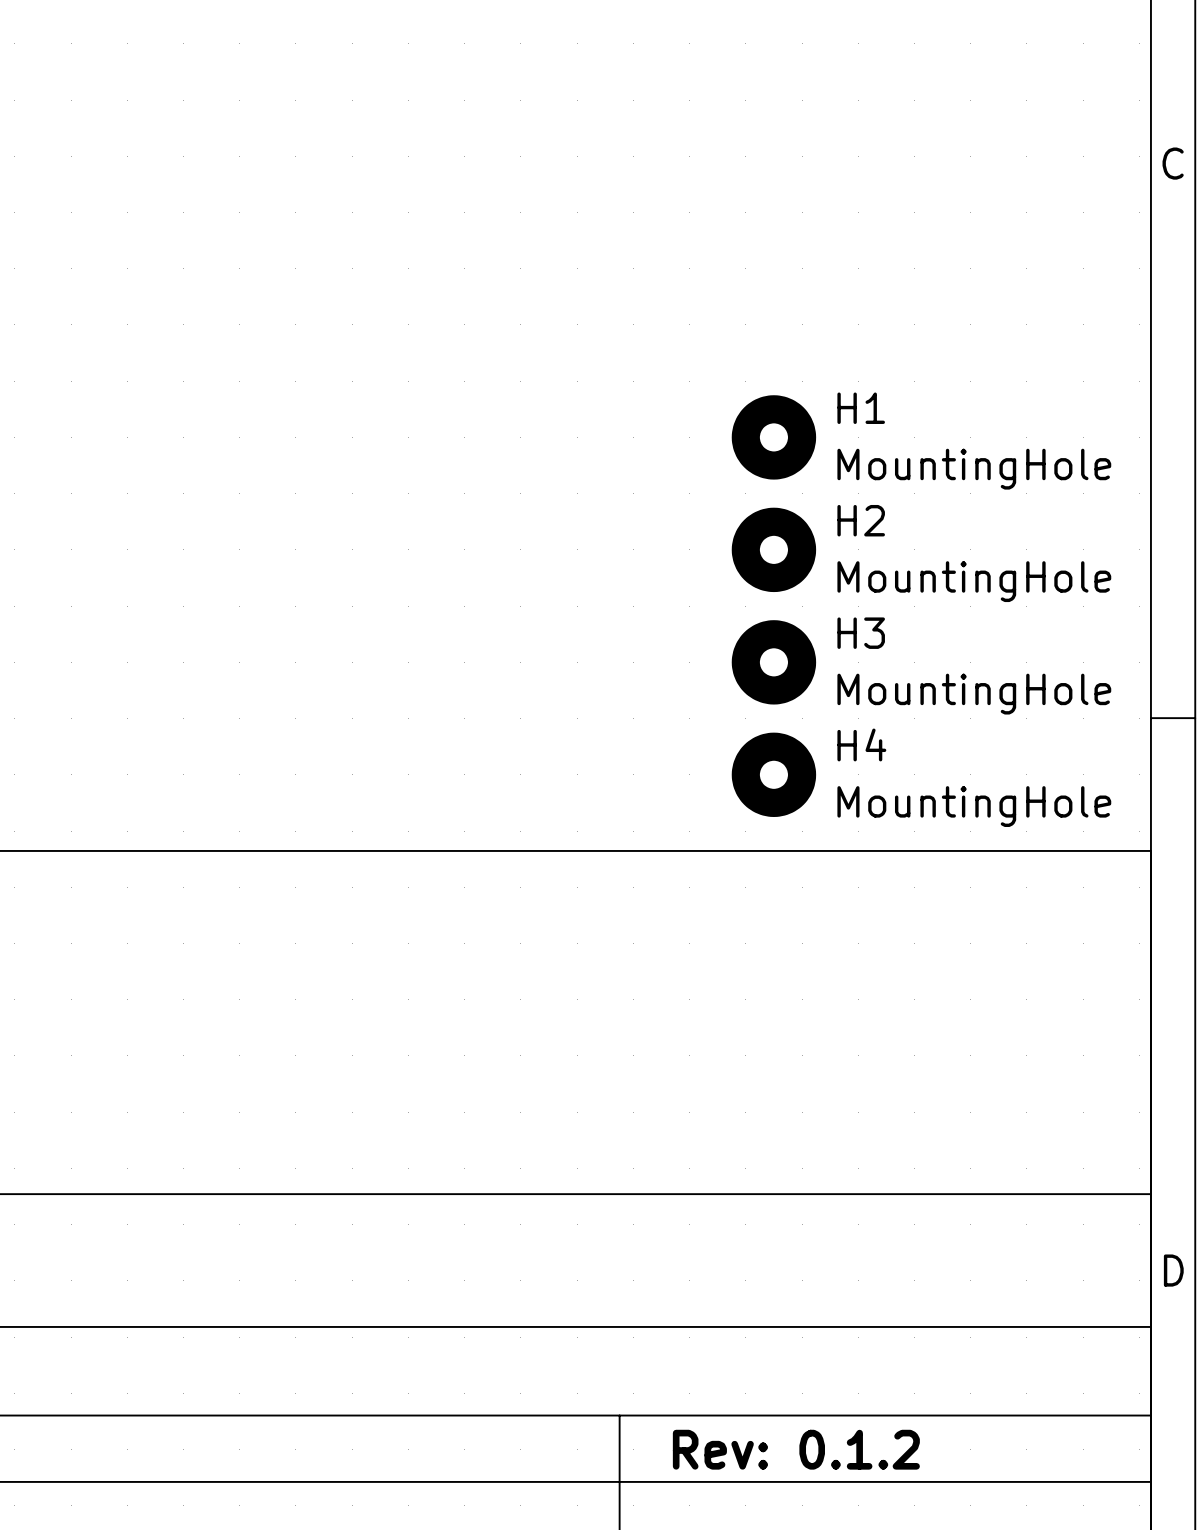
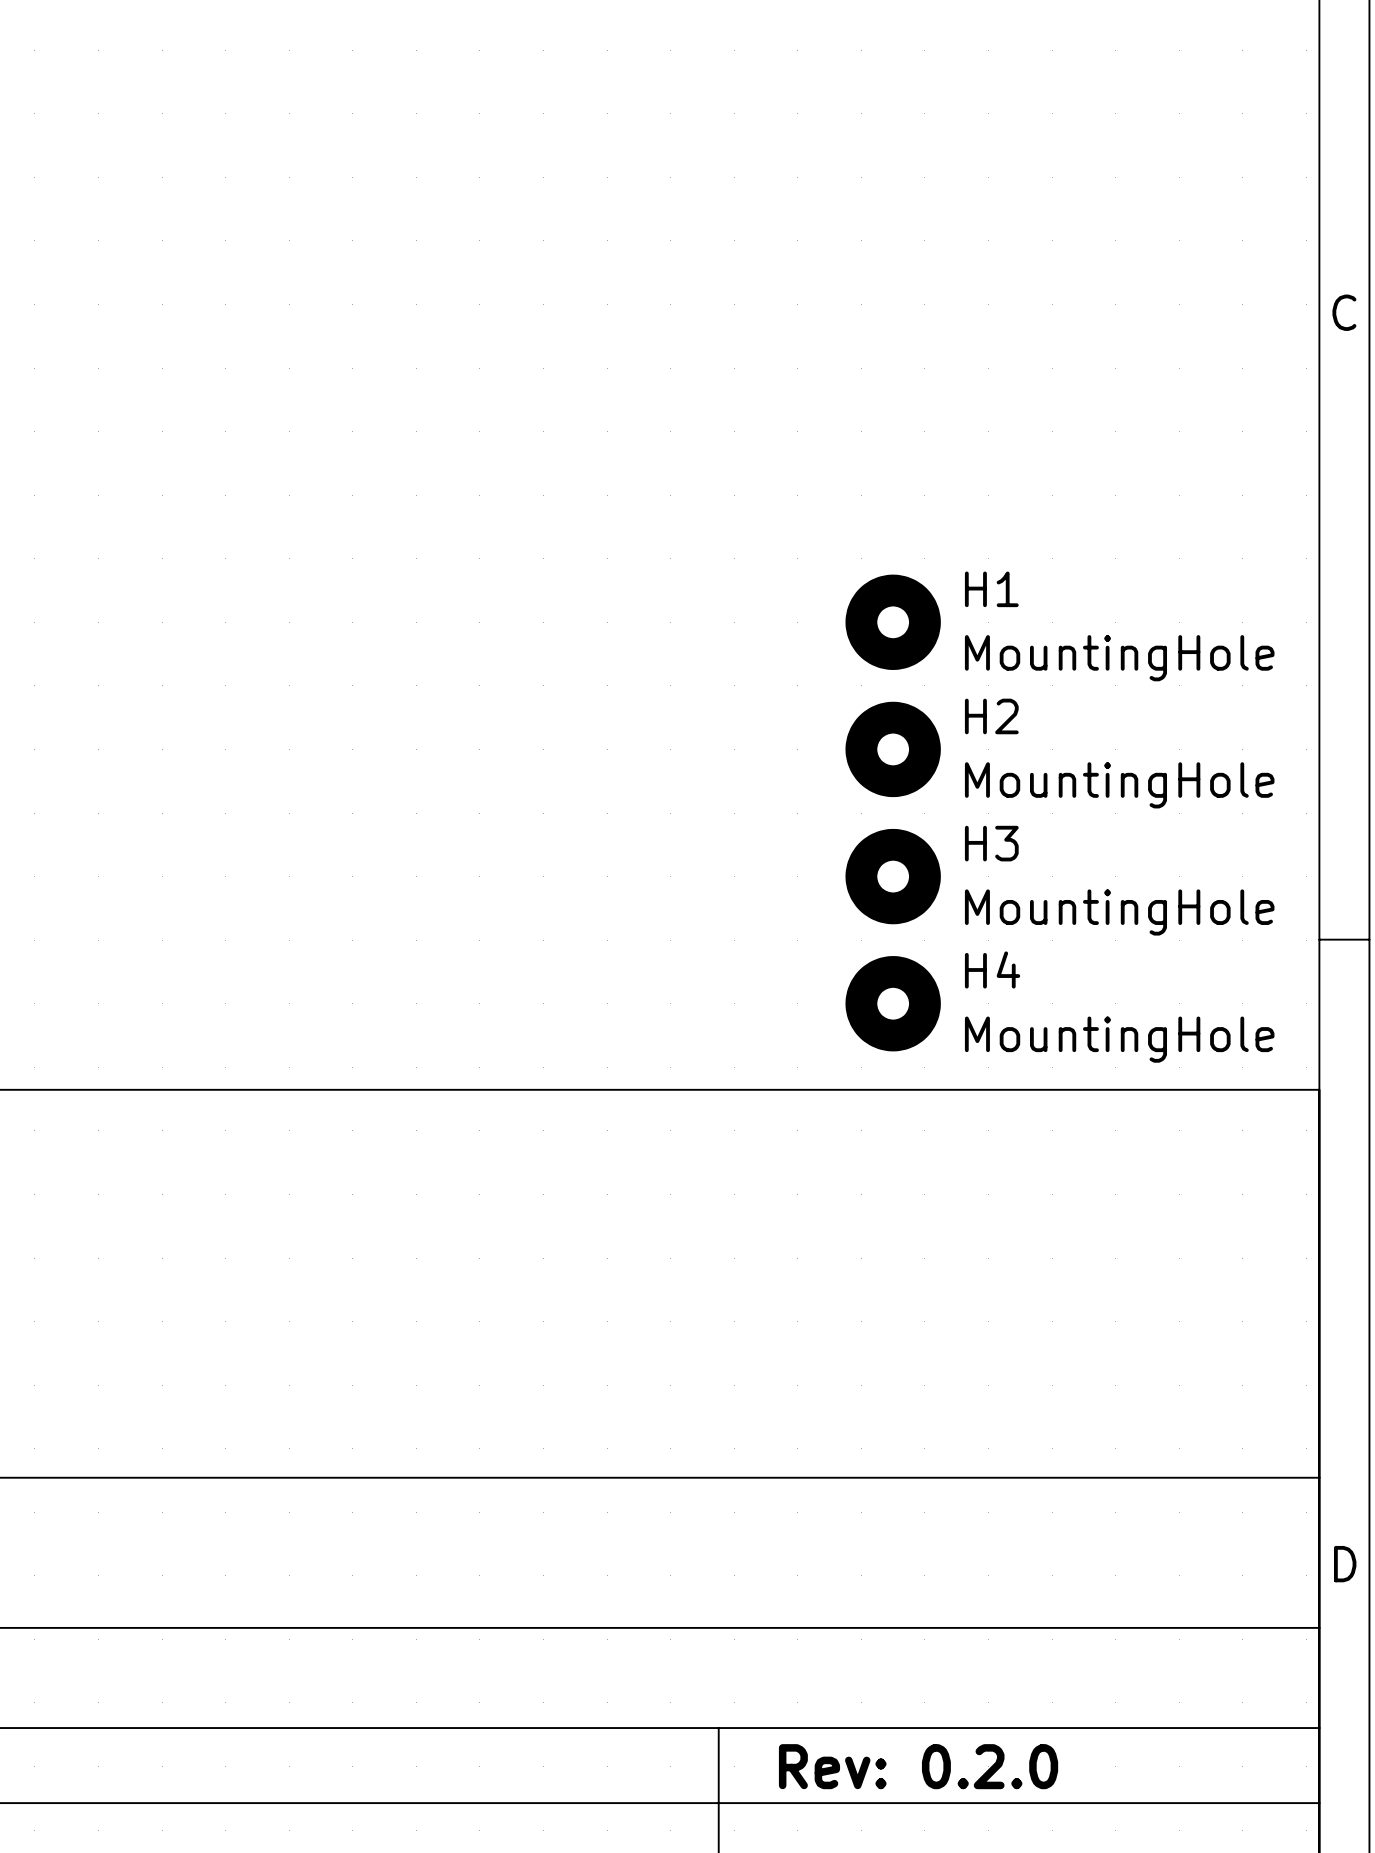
title block: Rev: 0.1.2 (796, 1449) -> Rev: 0.2.0 (918, 1766)

